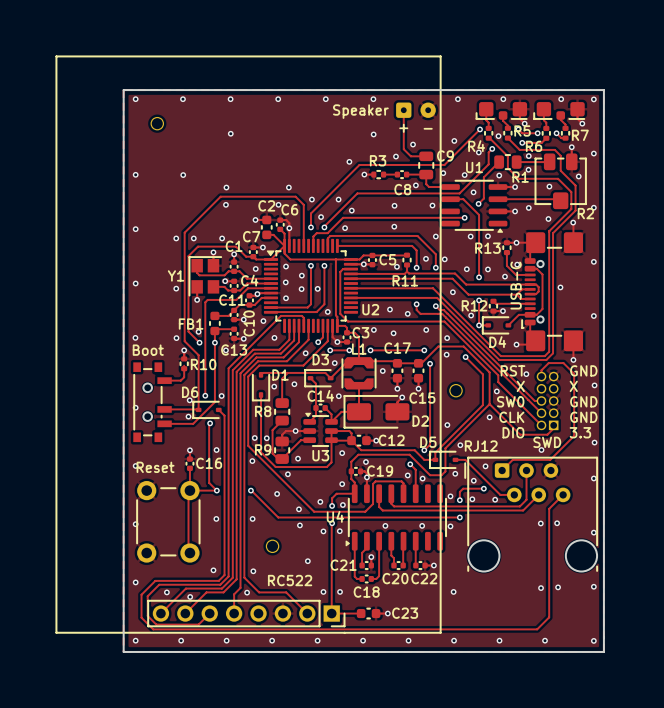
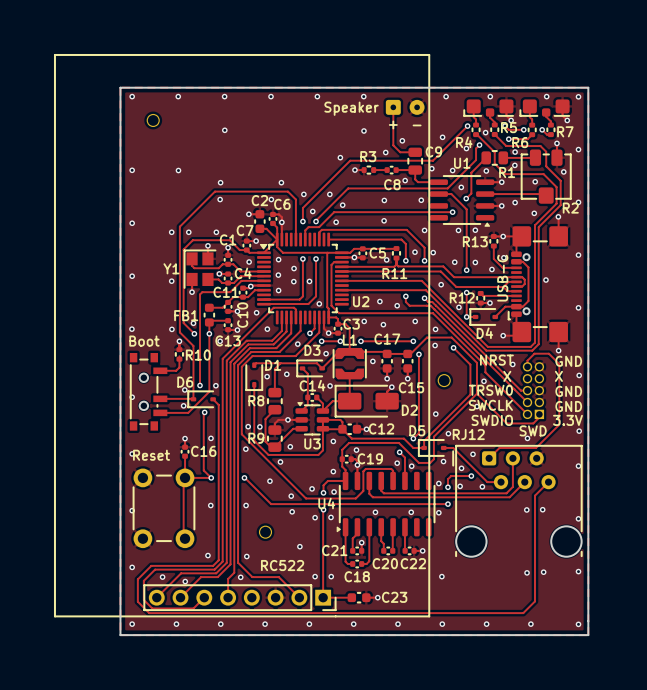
text: RST (512, 370) -> NRST (496, 360)
text: SW0 (510, 401) -> TRSW0 (490, 390)
text: CLK (511, 417) -> SWCLK (490, 405)
text: DIO (513, 432) -> SWDIO (492, 420)
text: 3.3 (580, 432) -> 3.3V (567, 420)

